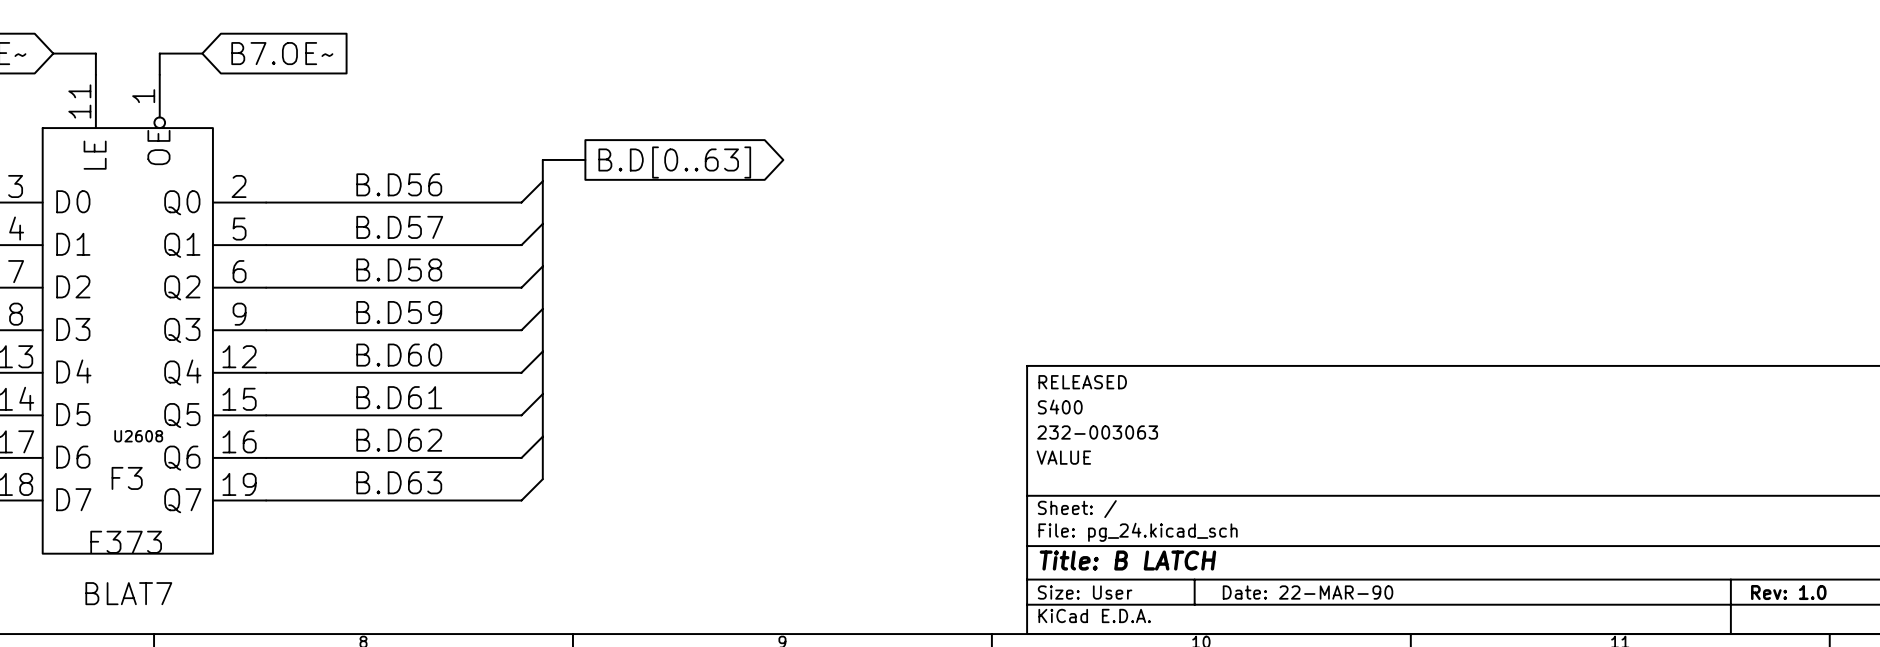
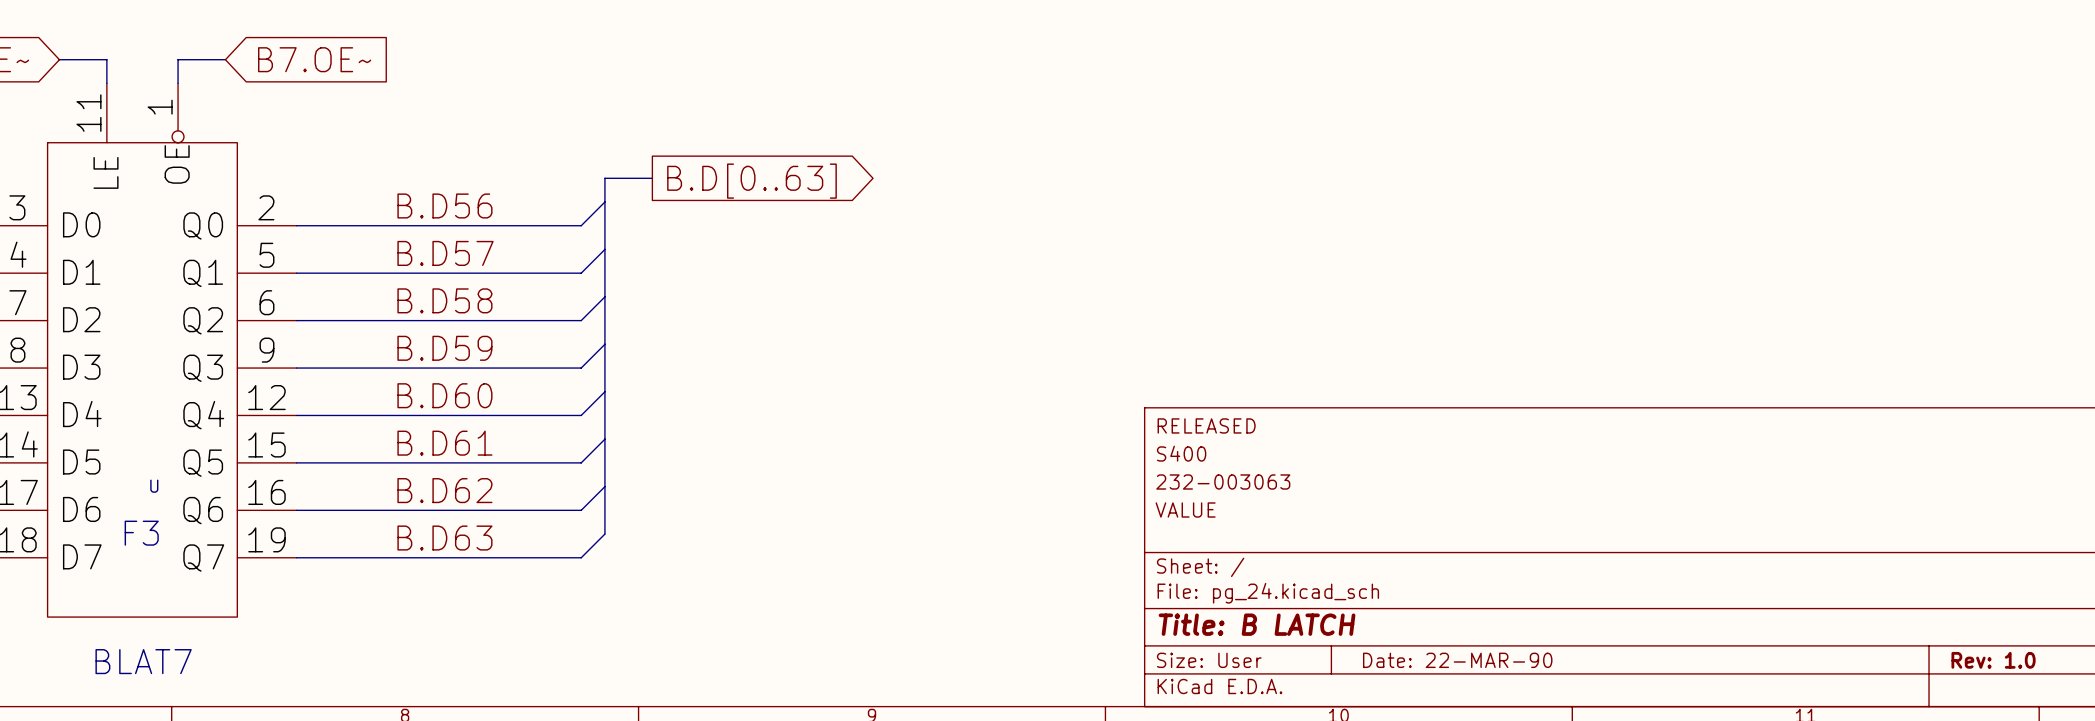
U2608 name: U2608 (138, 436) -> U (154, 486)
U2608 value: F373 (126, 542) -> none

